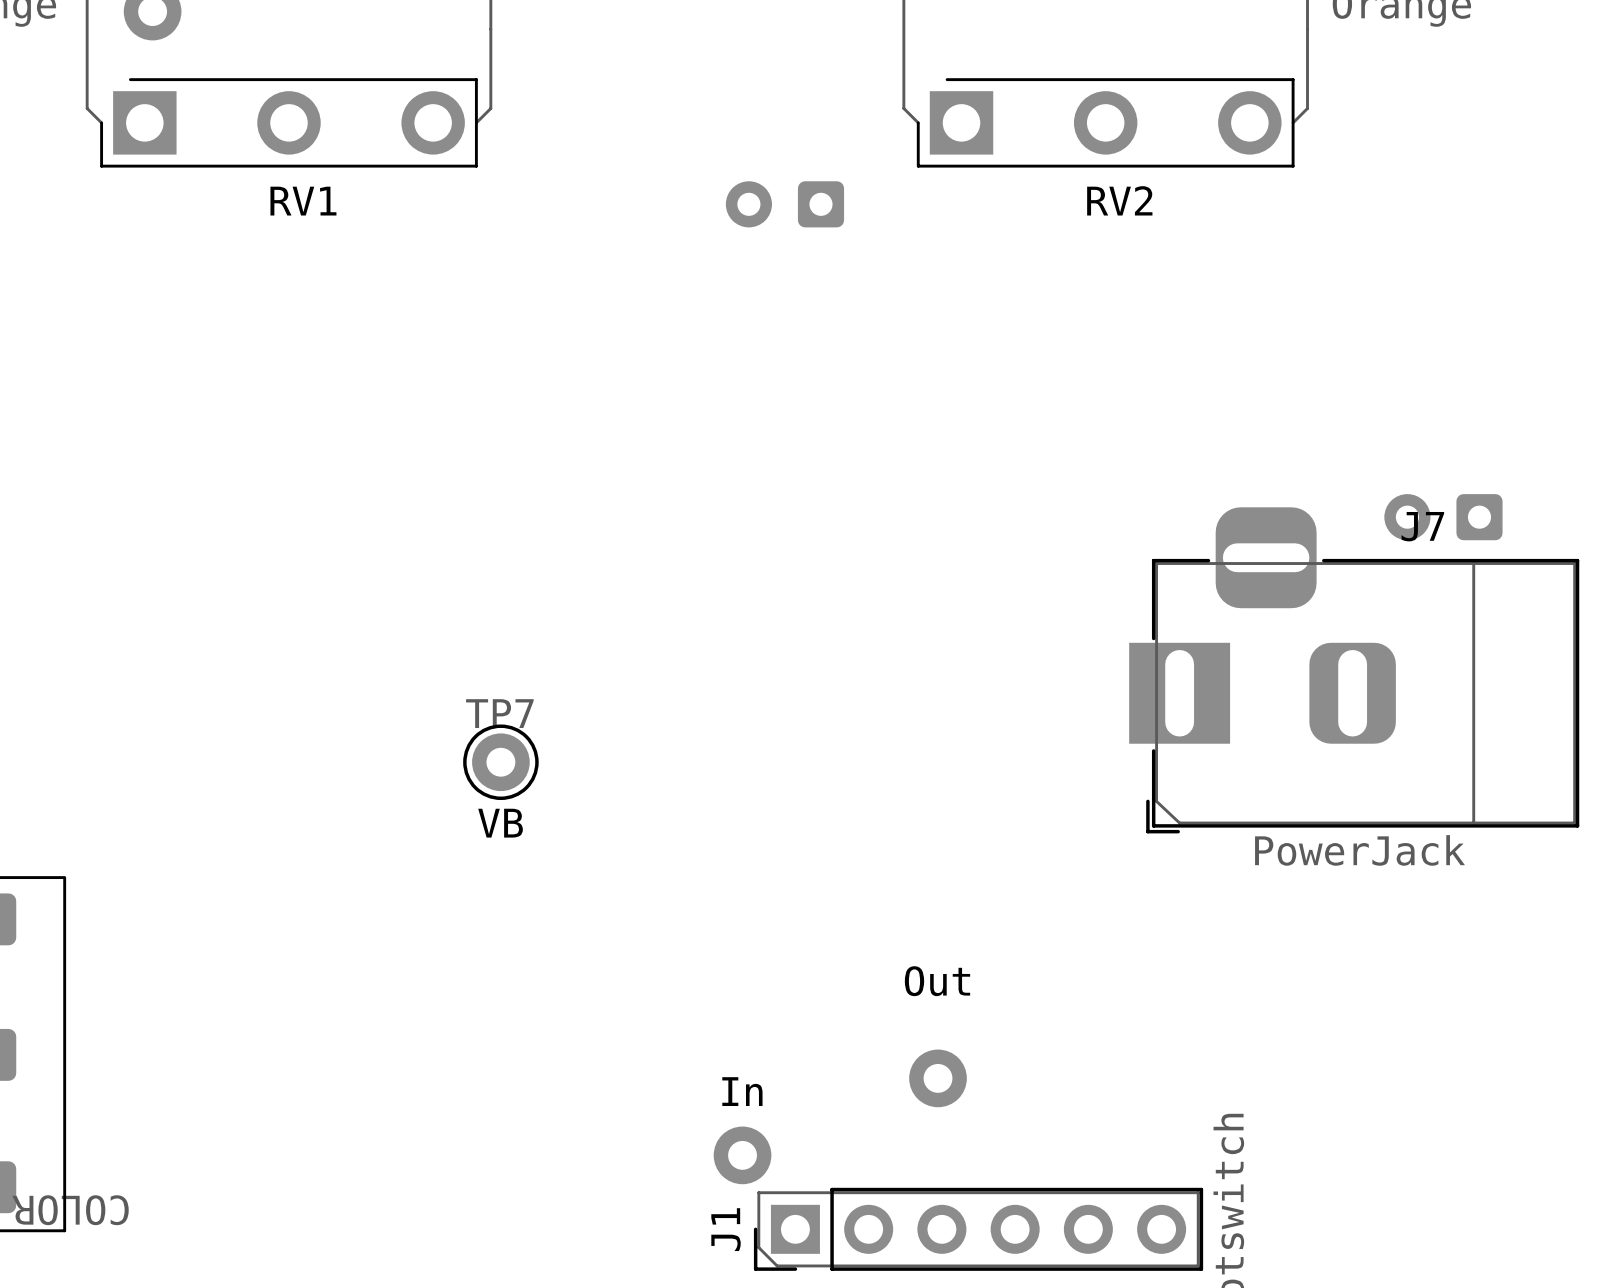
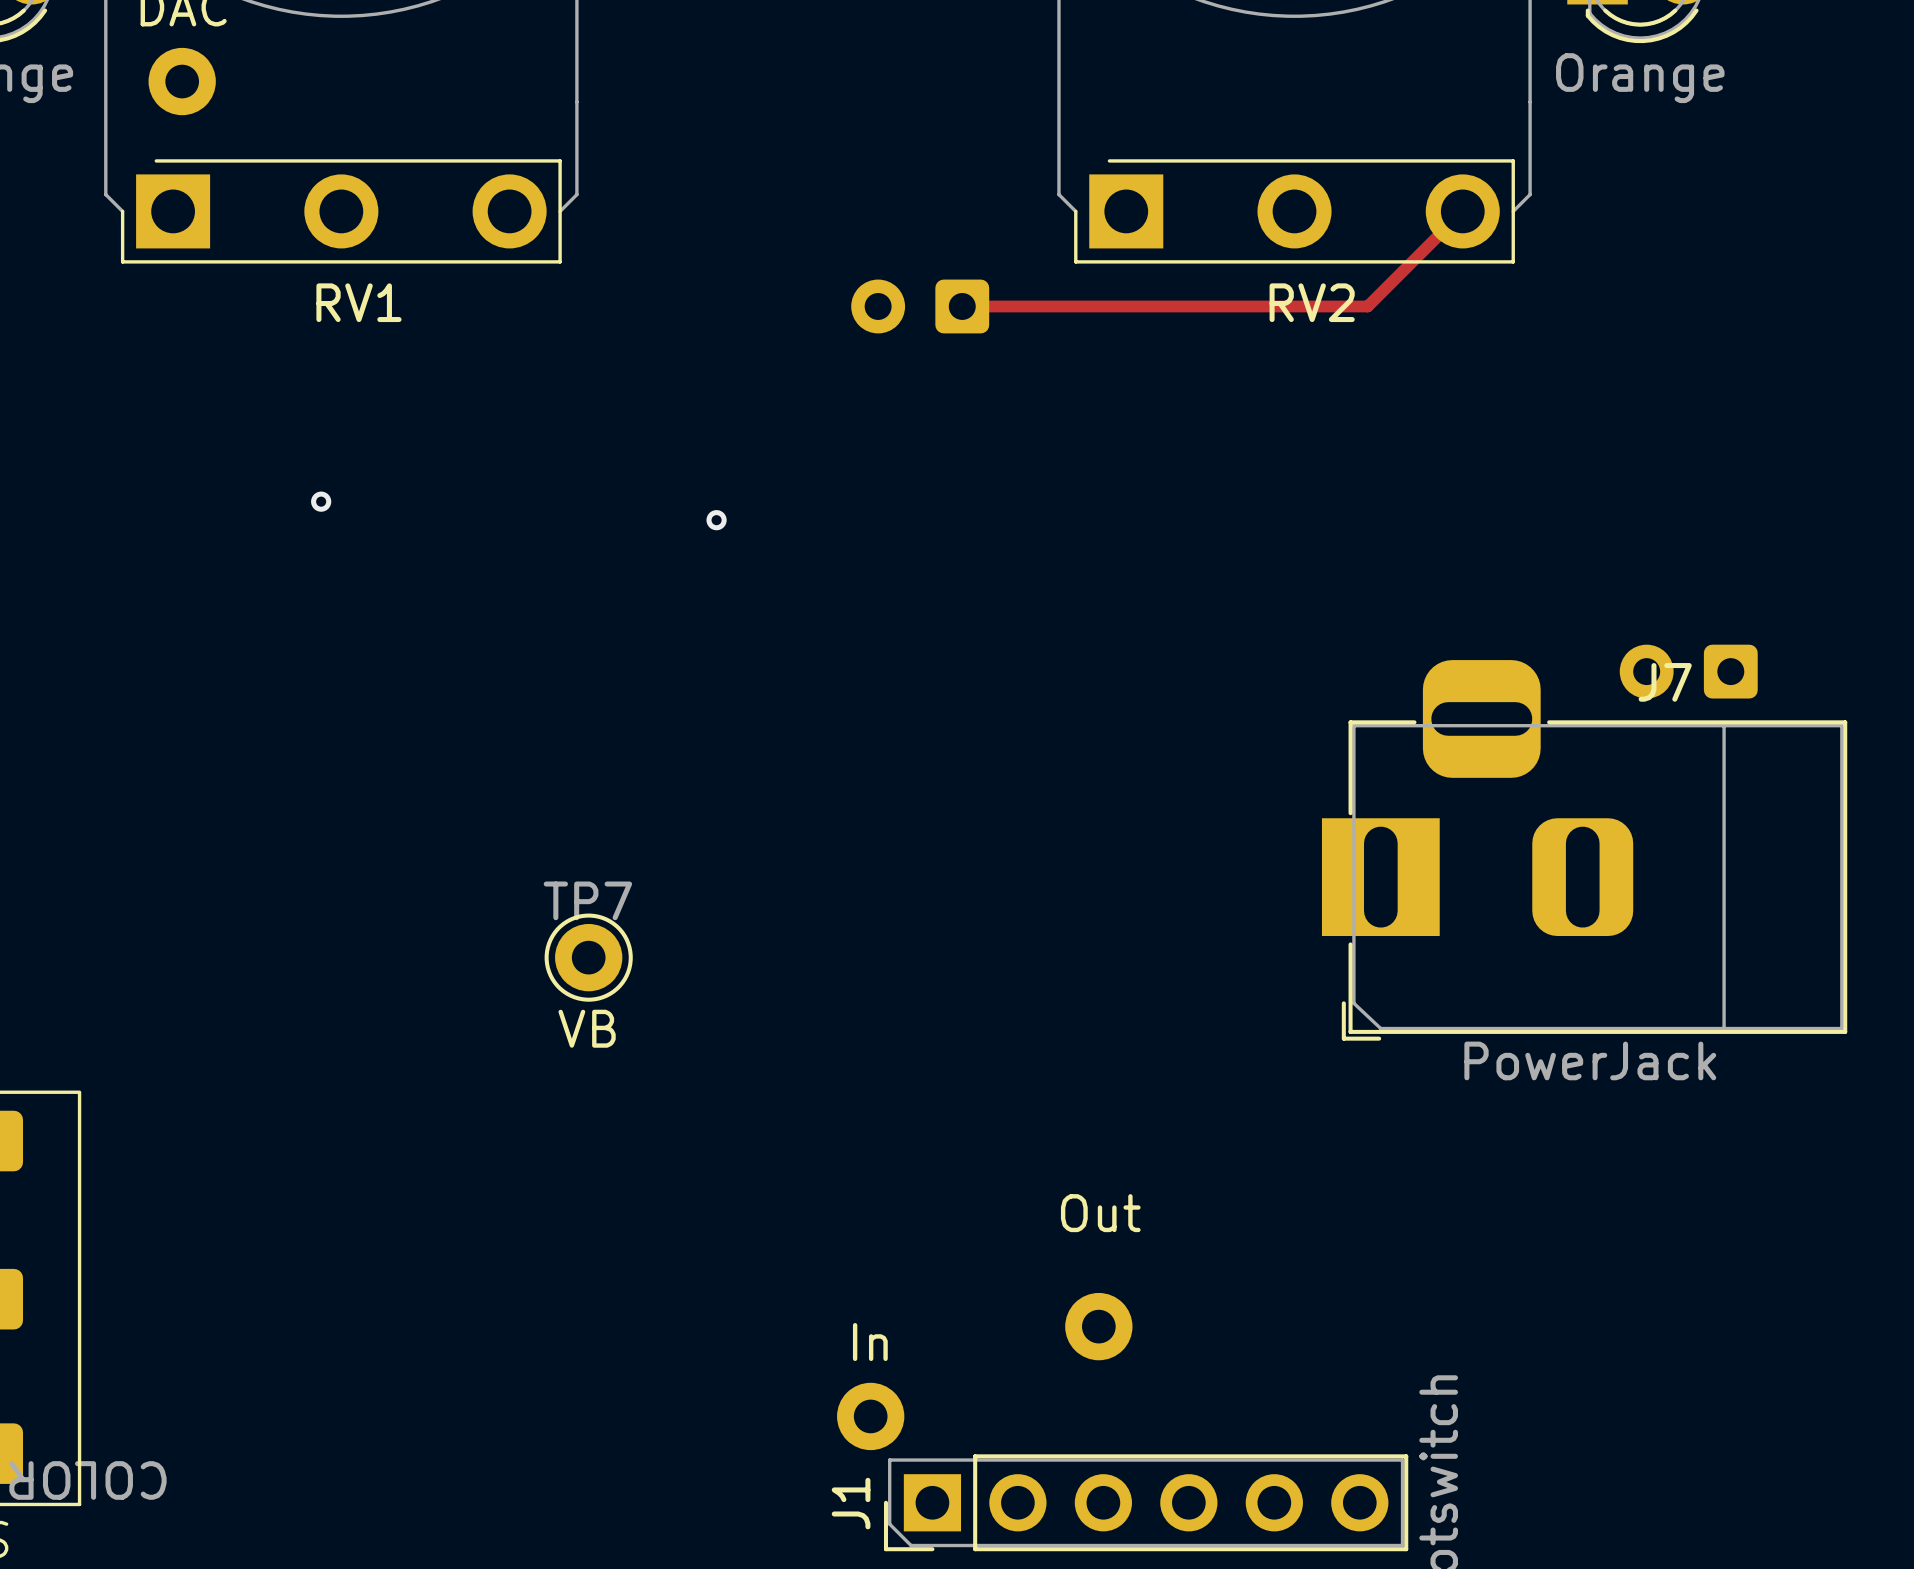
track: none -> (1462, 211) (1367, 306) (962, 306)
via: none -> (321, 501)
via: none -> (716, 520)

